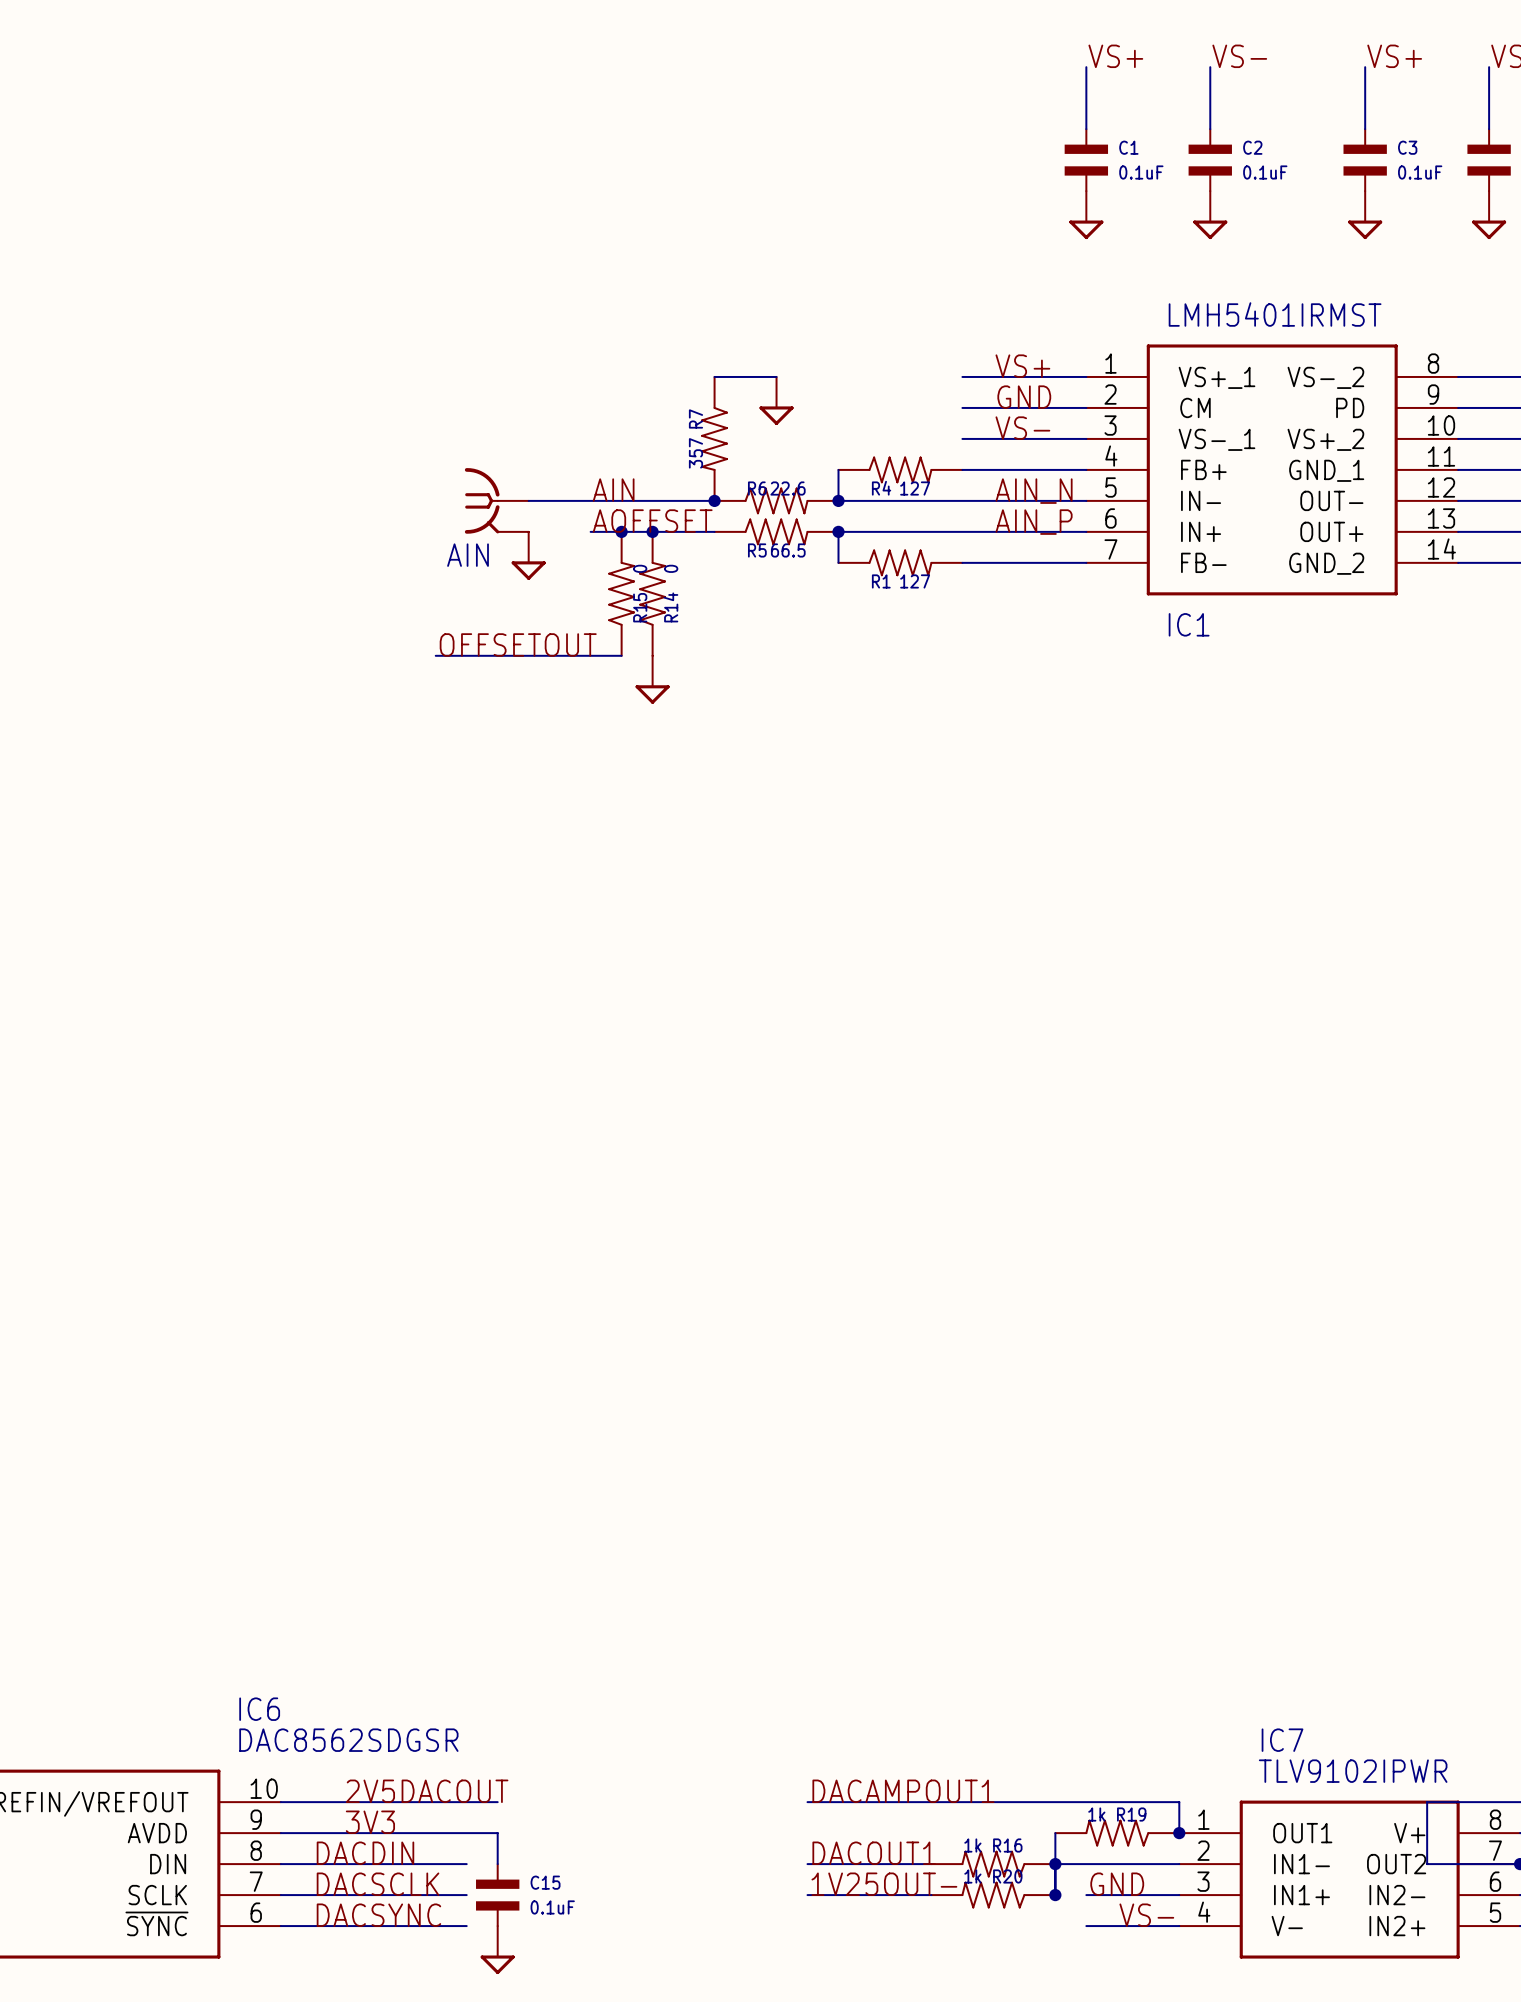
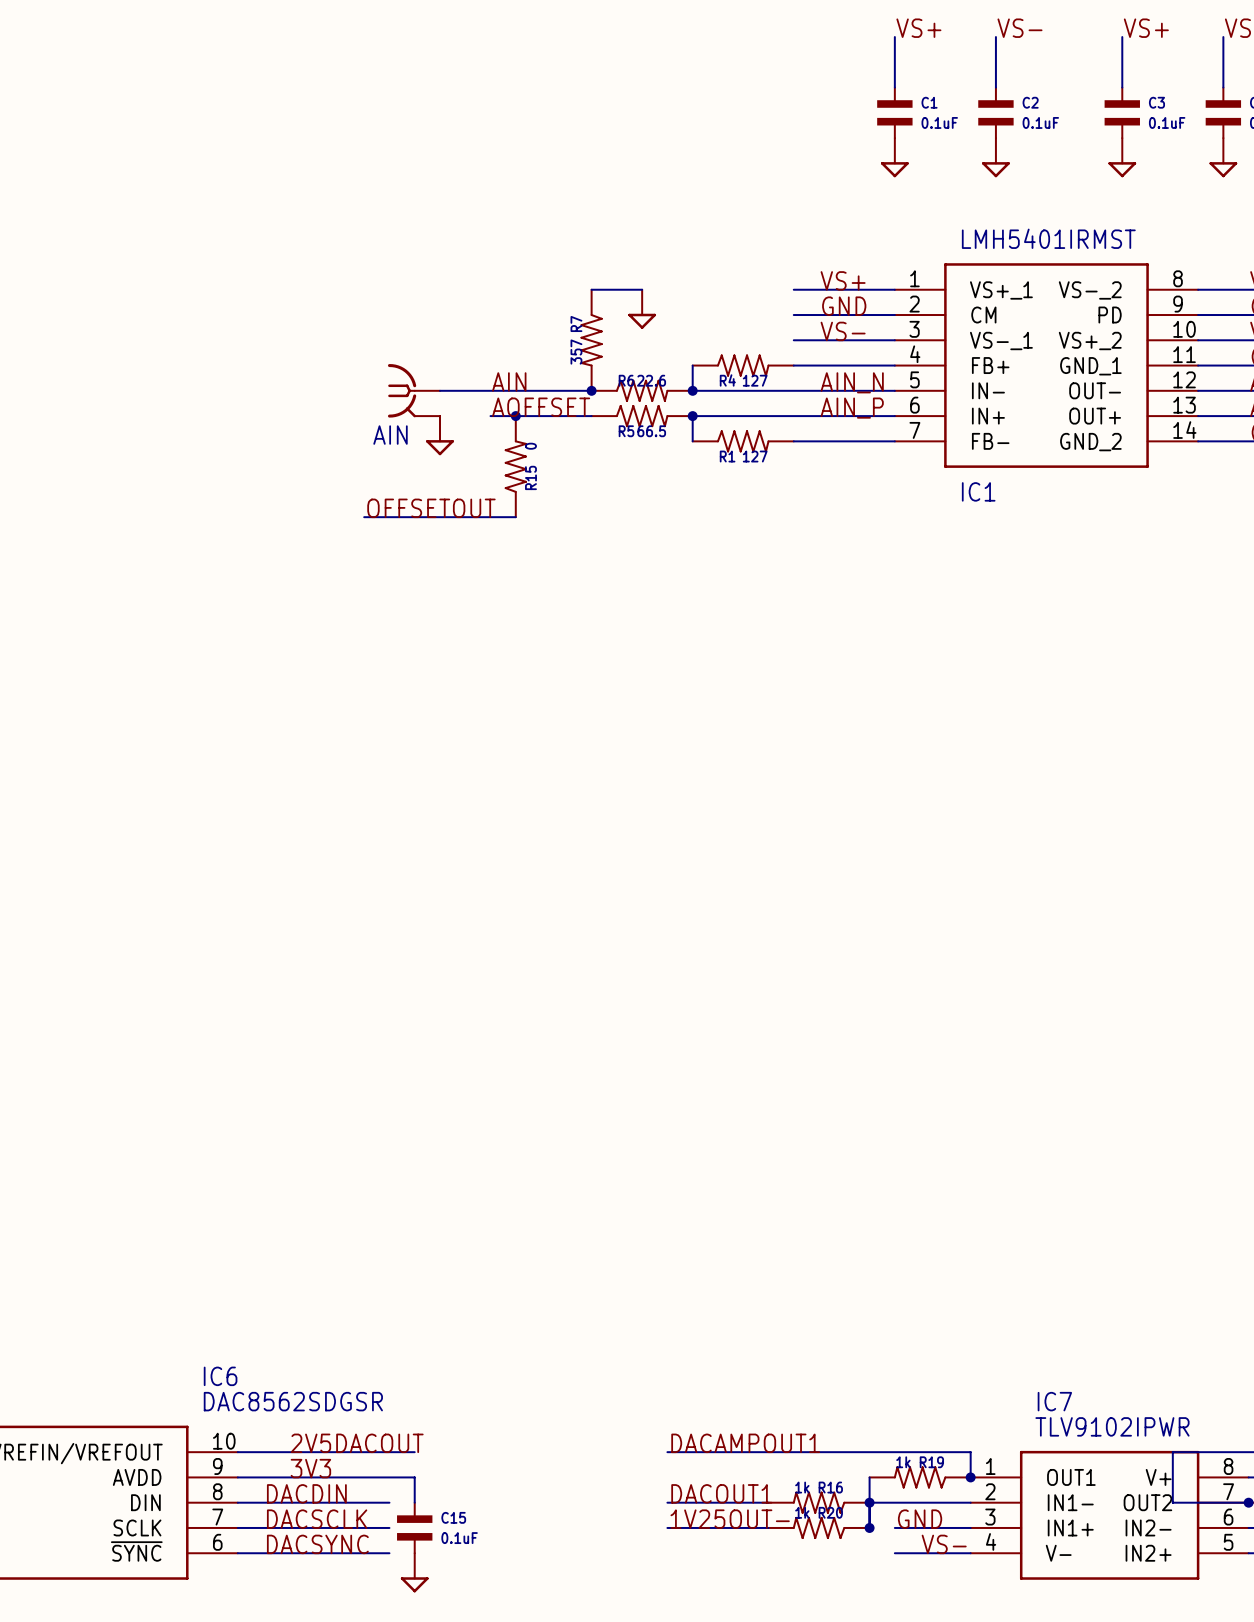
junction: (652, 531) -> none
R14: 0 (652, 593) -> none
power symbol: (652, 679) -> none

